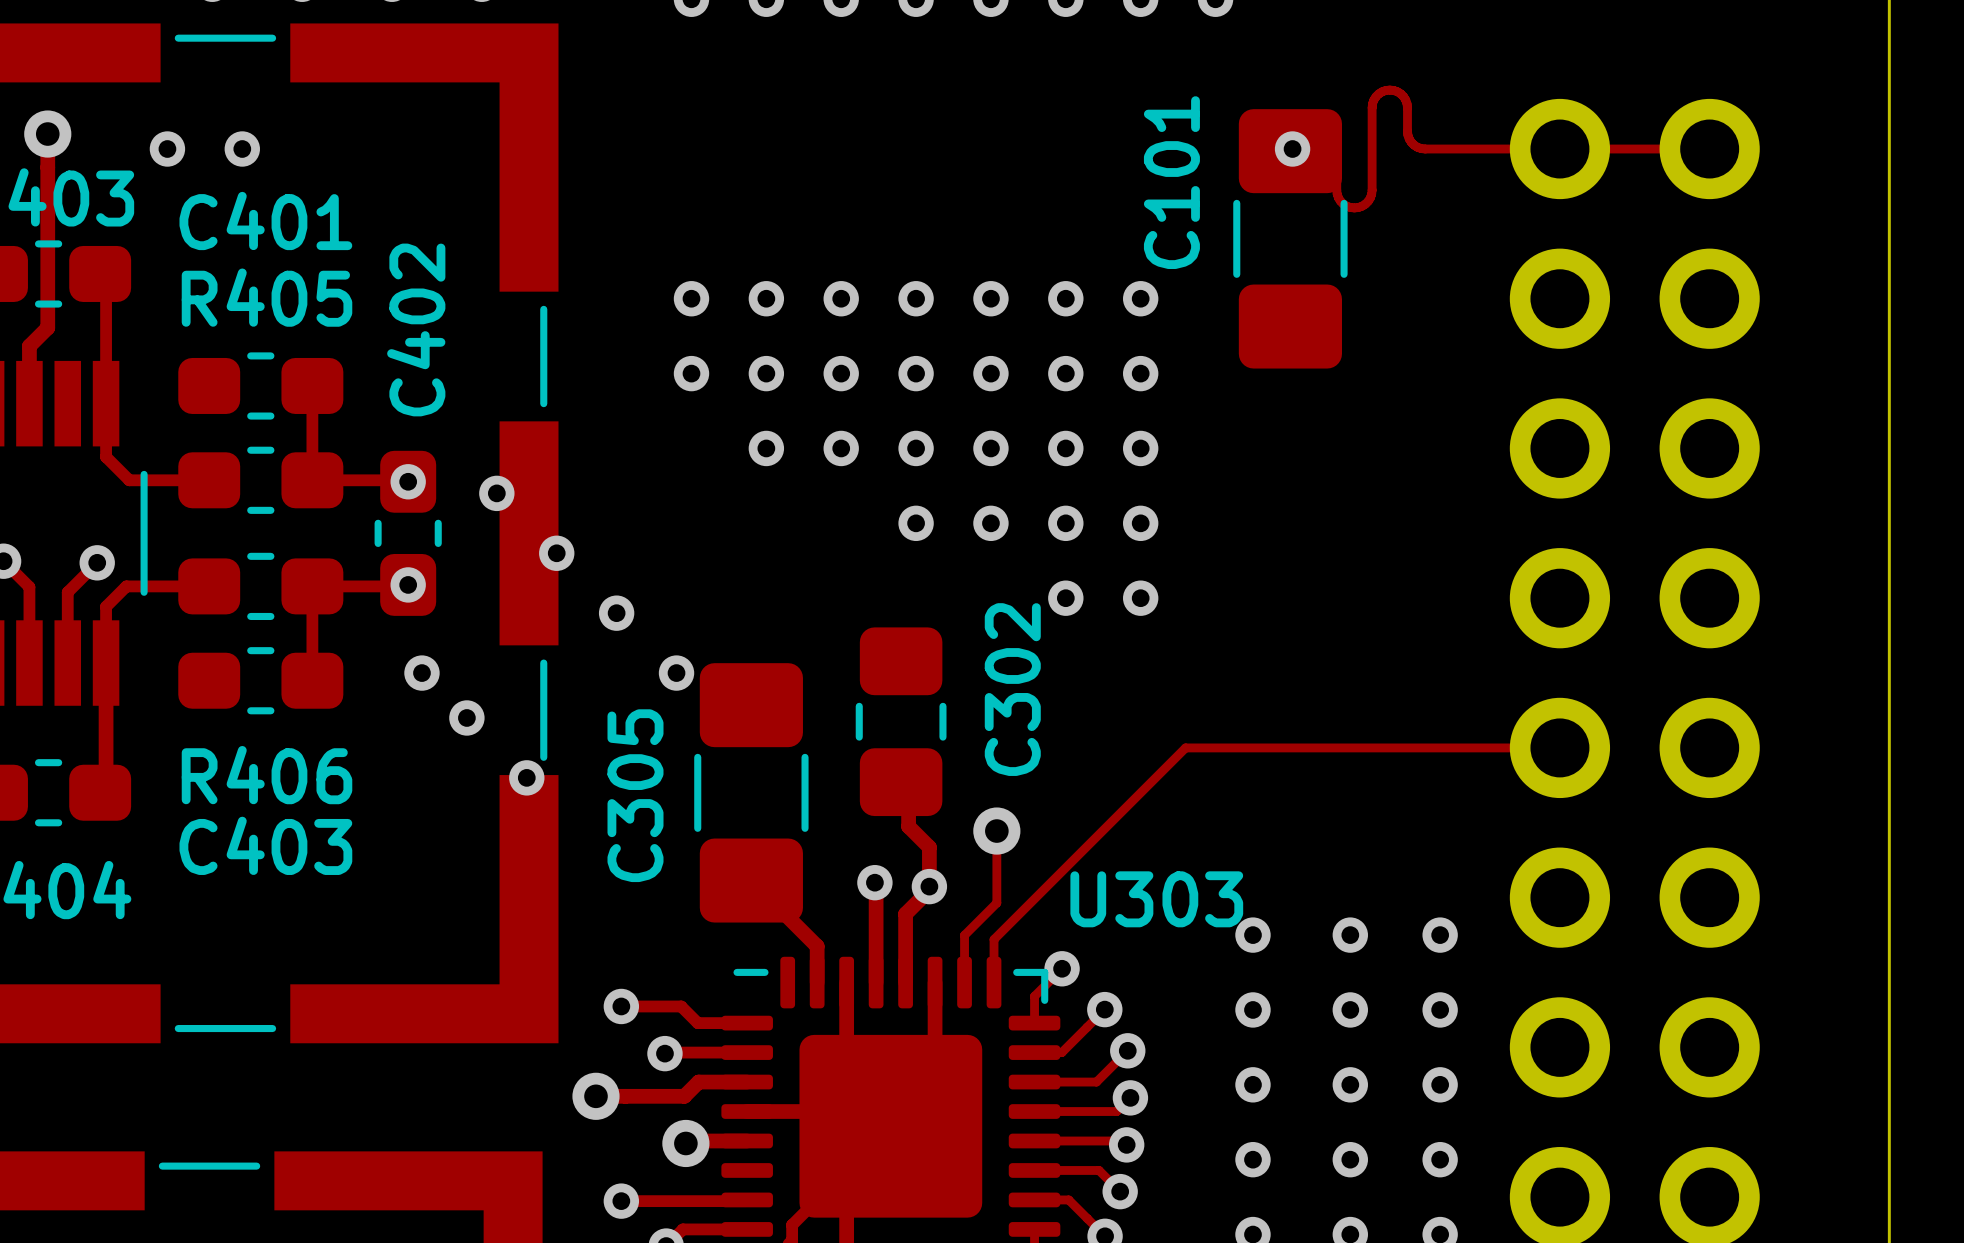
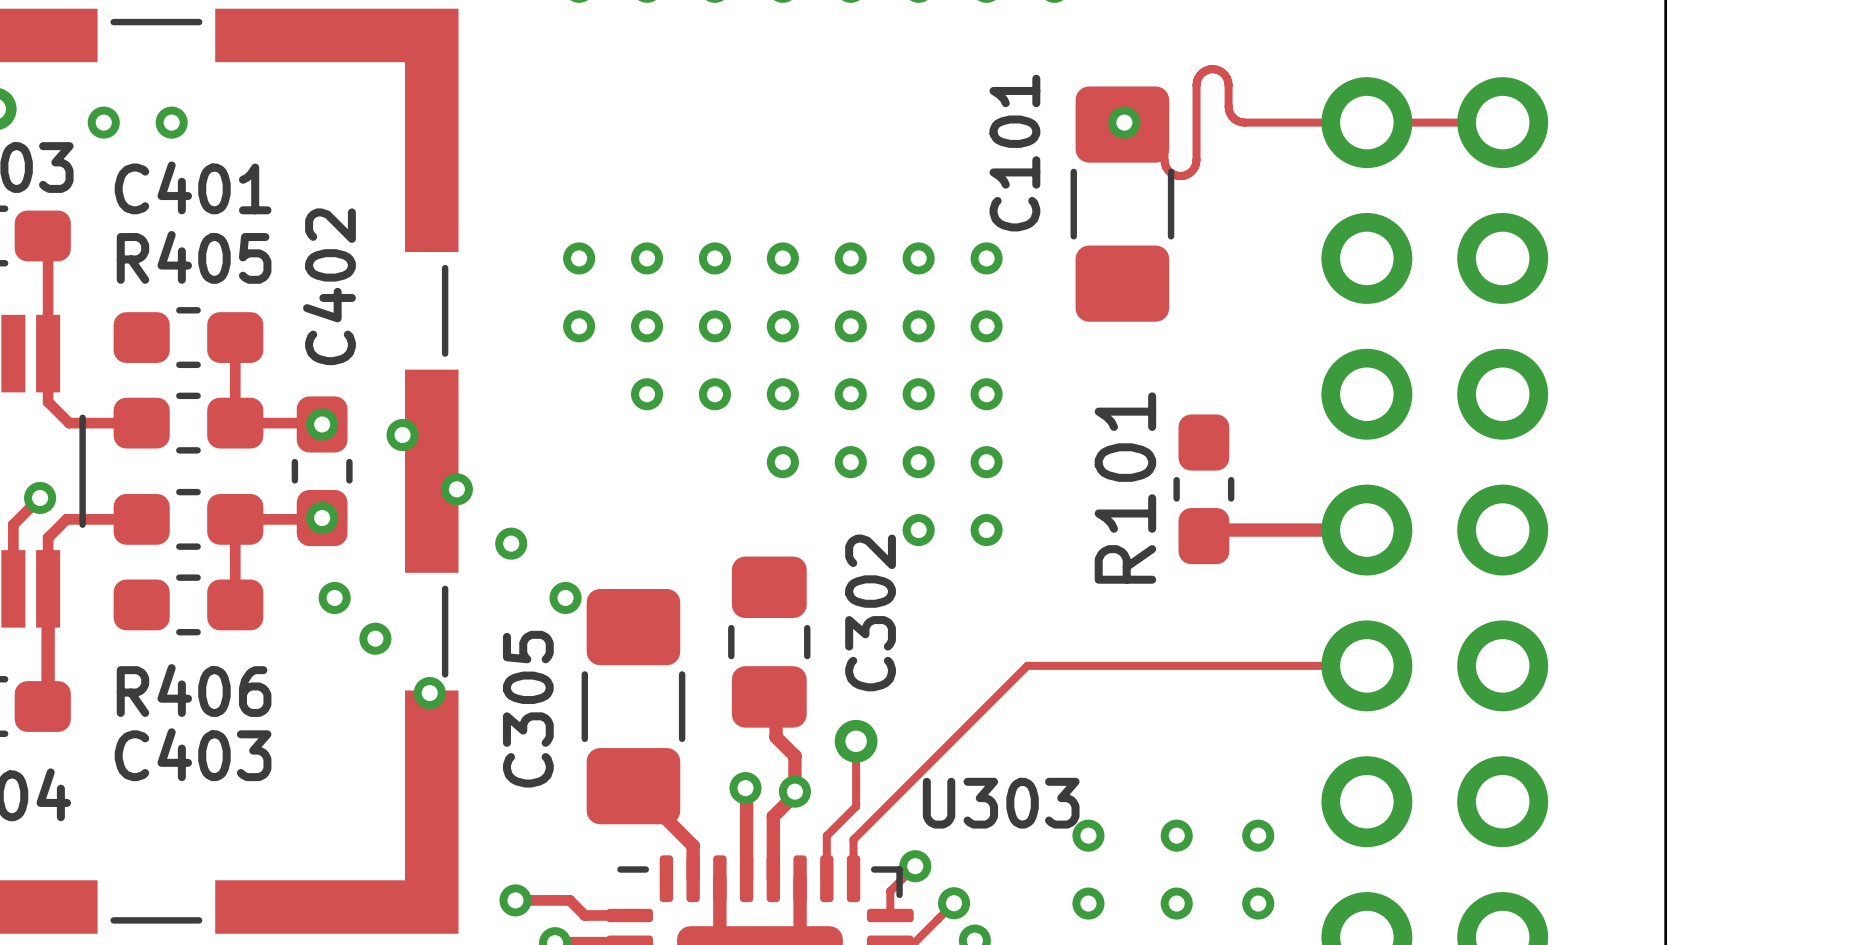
R101: none -> (1203, 489)
track: none -> (1366, 530) (1209, 530) (1203, 536)

